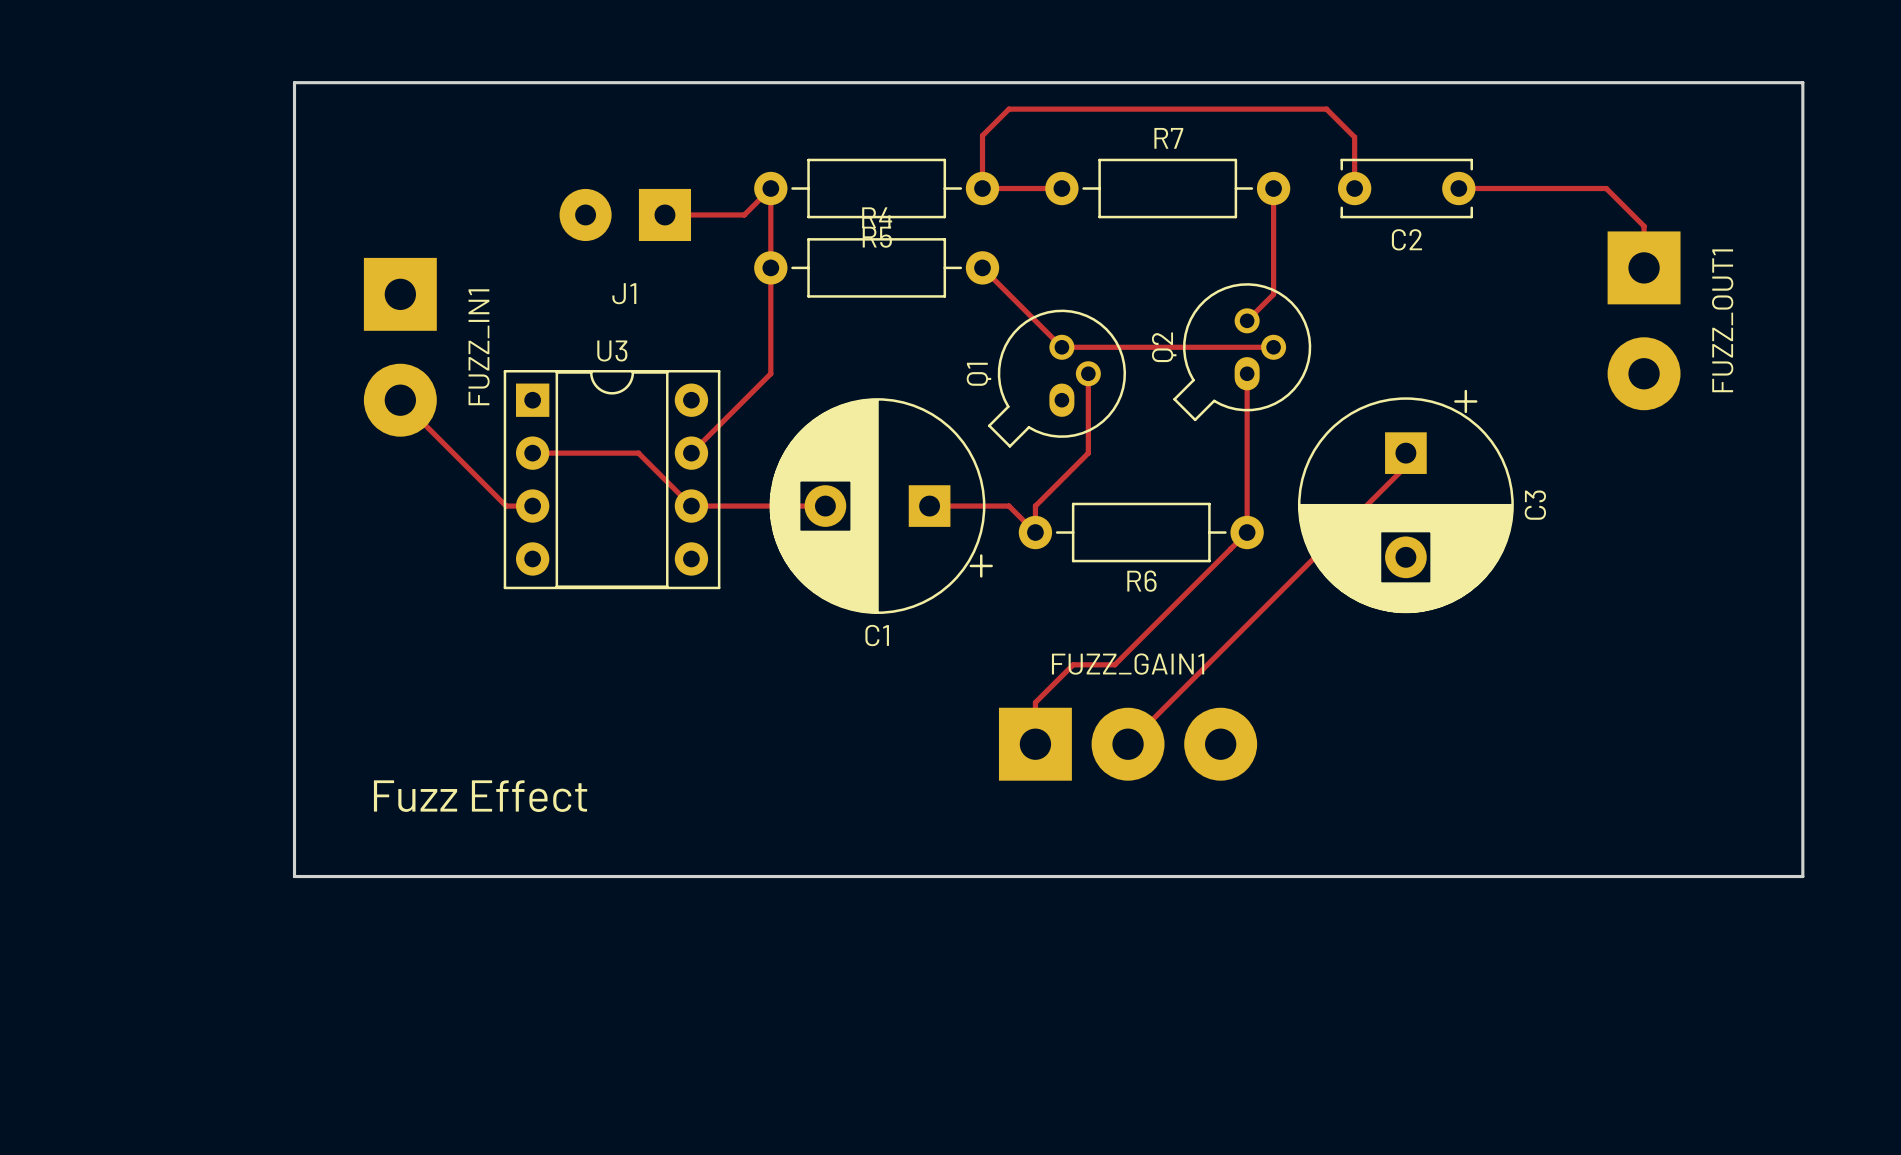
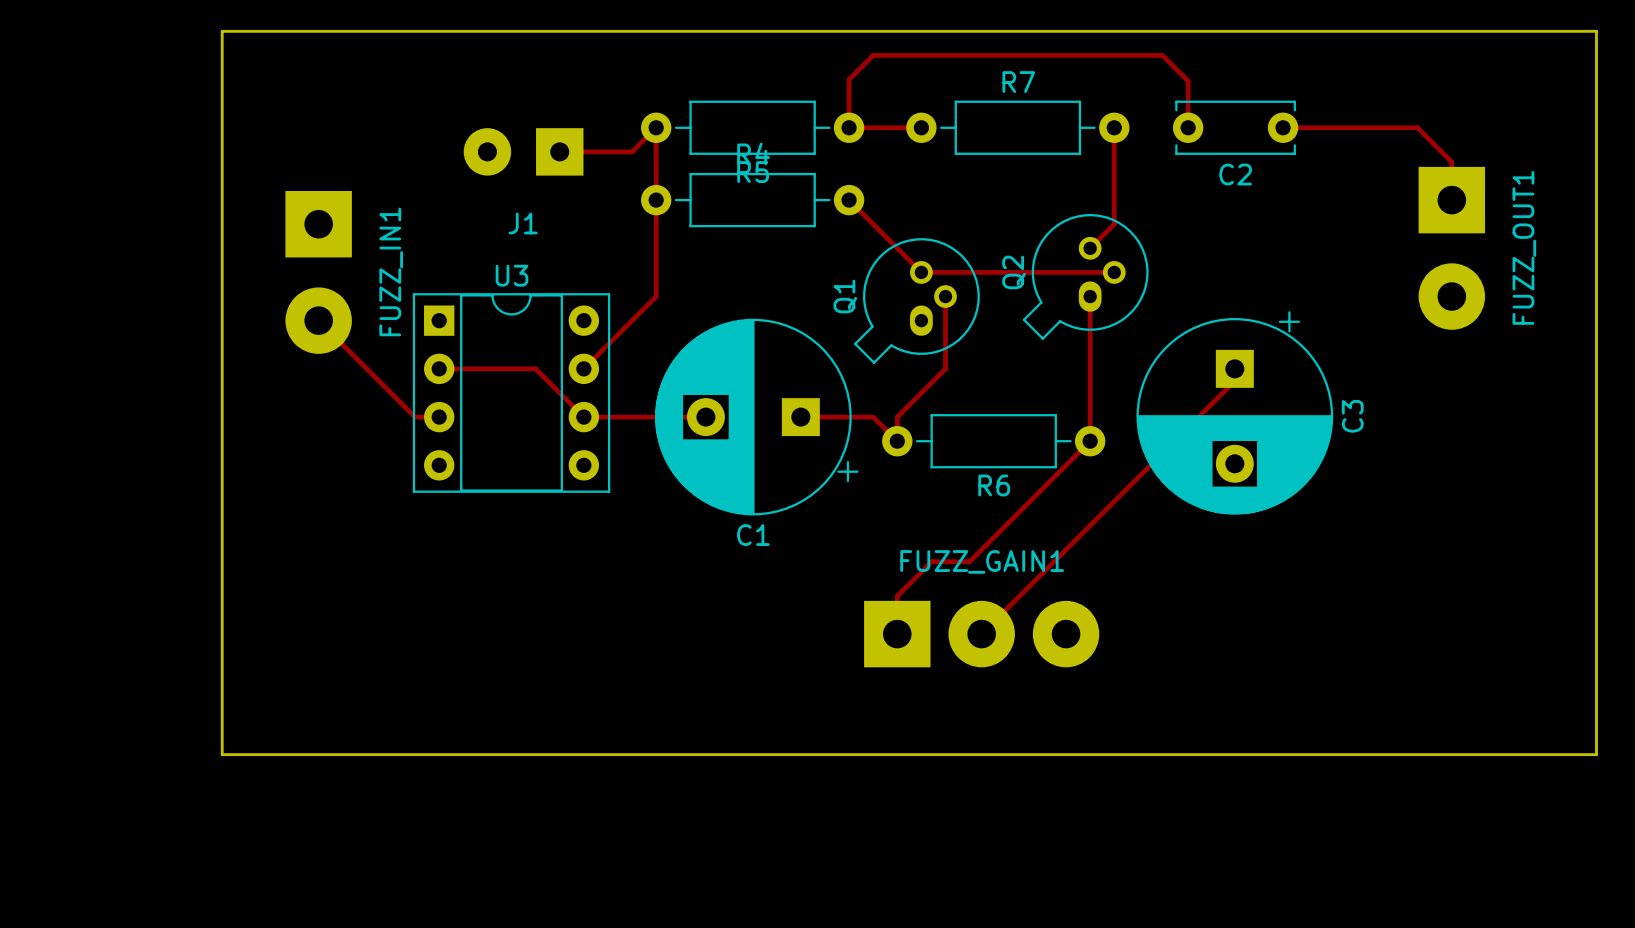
text: Fuzz Effect (480, 796) -> none

